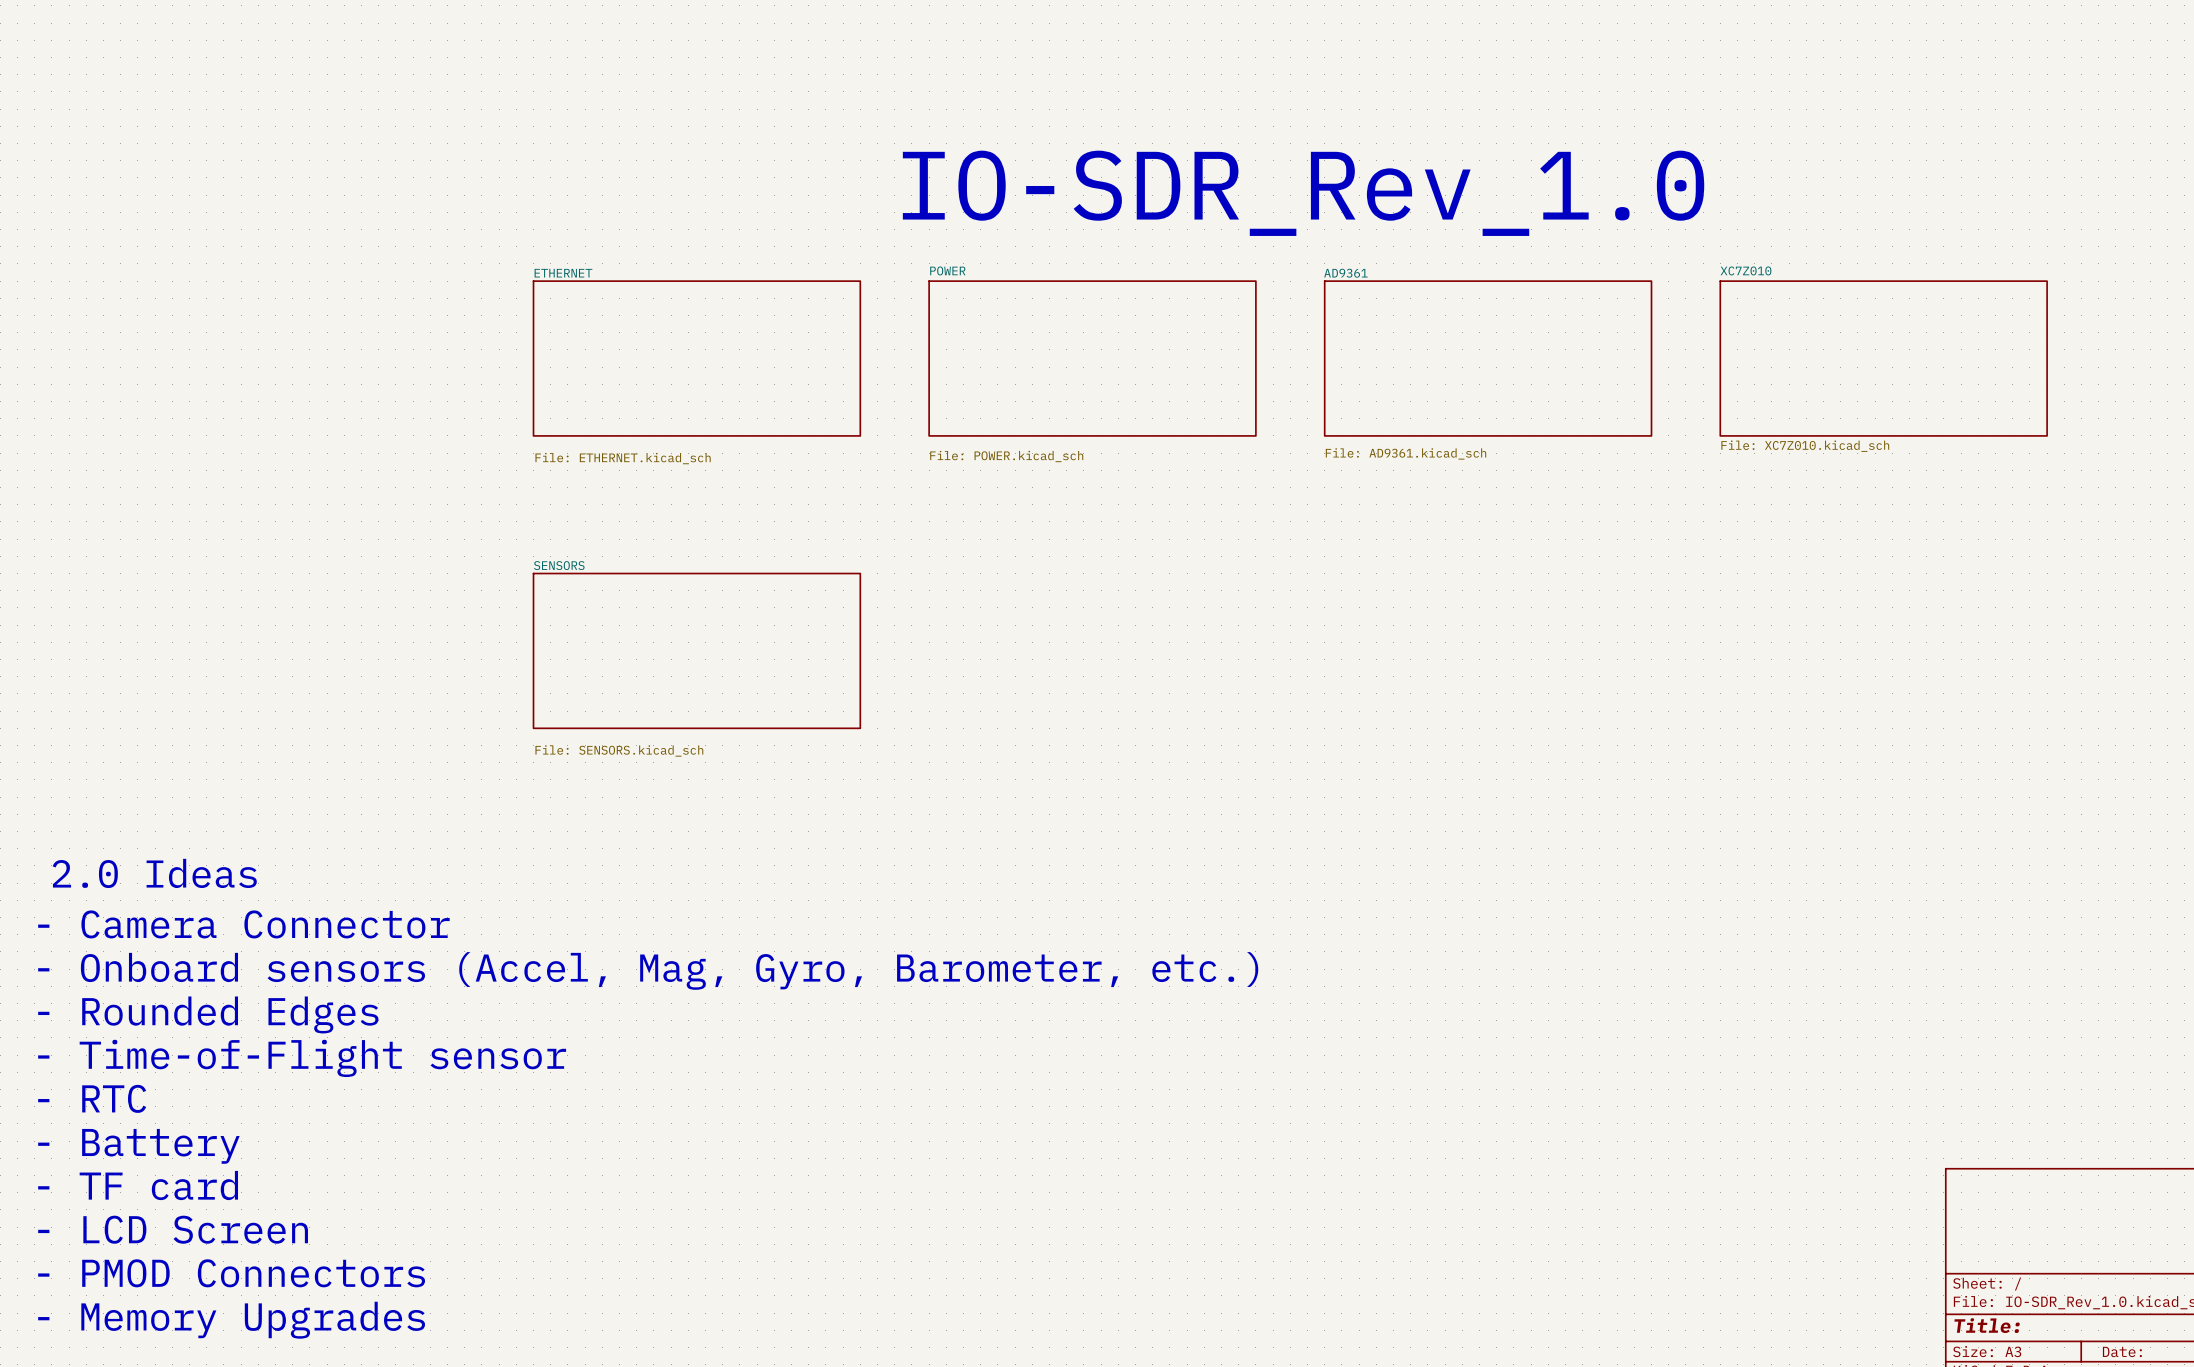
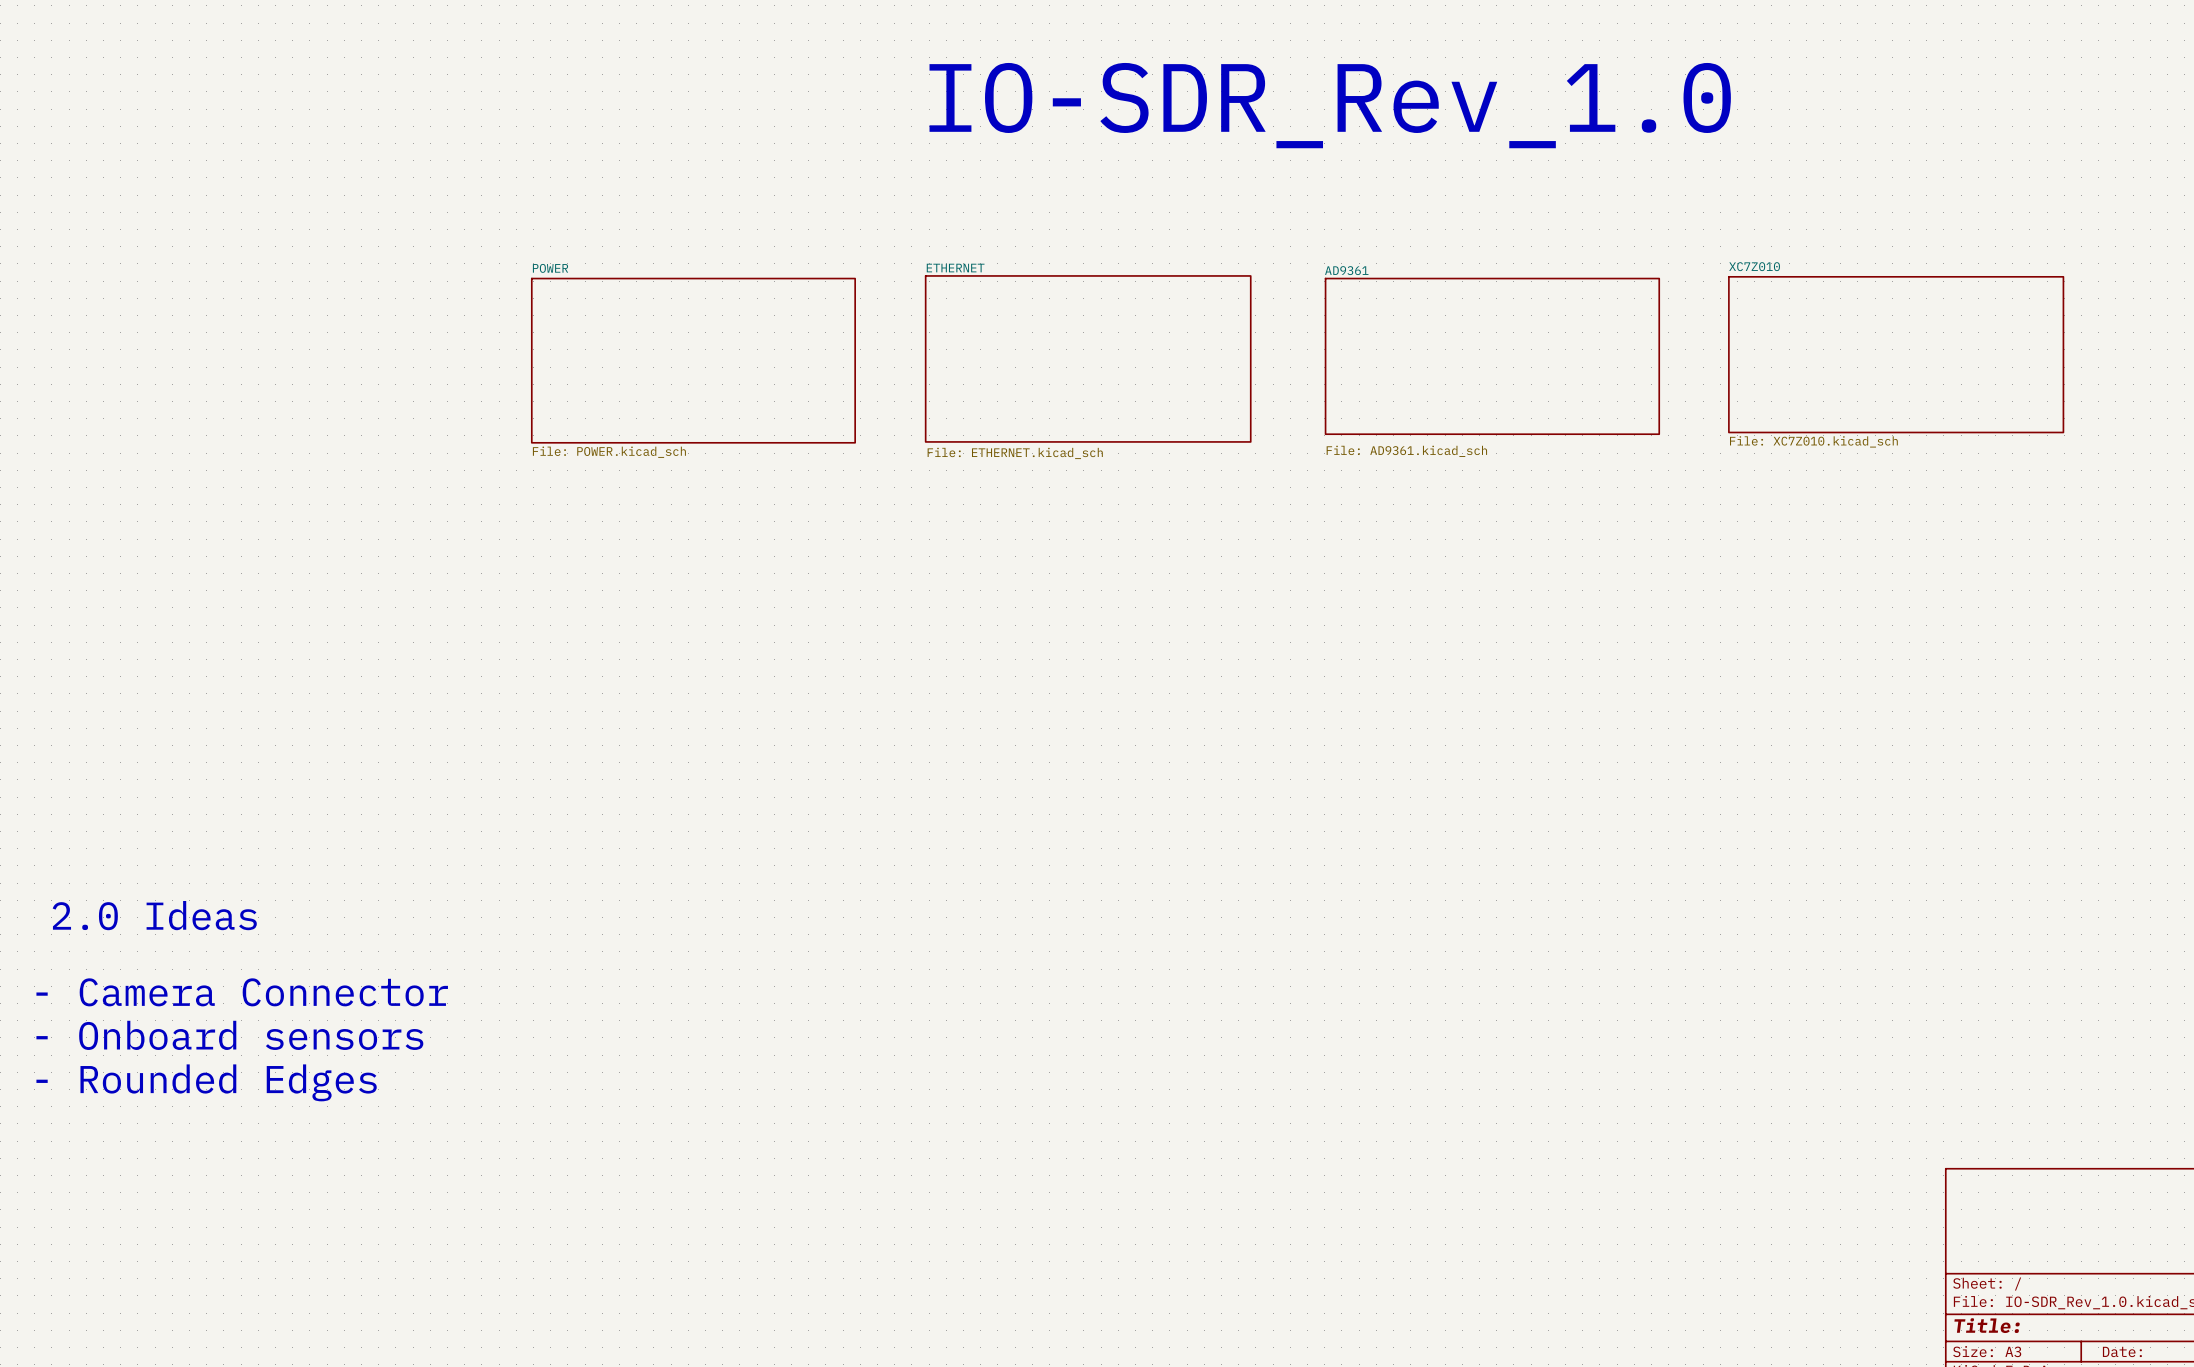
text position: IO-SDR_Rev_1.0 (1303, 193) -> IO-SDR_Rev_1.0 (1330, 105)
sheet AD9361 shape: [1324, 280, 1653, 437] -> [1325, 278, 1660, 435]
sheet XC7Z010 shape: [1719, 280, 2048, 437] -> [1728, 276, 2064, 434]
sheet ETHERNET: File: ETHERNET.kicad_sch (696, 358) -> none
sheet ETHERNET: none -> File: ETHERNET.kicad_sch (1088, 358)
sheet POWER: File: POWER.kicad_sch (1092, 358) -> none
sheet POWER: none -> File: POWER.kicad_sch (693, 360)
sheet SENSORS: File: SENSORS.kicad_sch (696, 650) -> none
text position: 2.0 Ideas (154, 873) -> 2.0 Ideas (154, 915)
text position: - Camera Connector (243, 924) -> - Camera Connector (242, 992)
text: - Onboard sensors (Accel, Mag, Gyro, Barometer, etc.) (648, 970) -> none
text position: - Rounded Edges (208, 1014) -> - Rounded Edges (206, 1082)
text: none -> - Onboard sensors (229, 1035)
text: - Time-of-Flight sensor (302, 1058) -> none
text: - RTC (92, 1098) -> none
text: - Battery (138, 1146) -> none
text: - TF card (138, 1185) -> none
text: - LCD Screen (173, 1229) -> none
text: - PMOD Connectors (231, 1273) -> none
text: - Memory Upgrades (231, 1320) -> none

